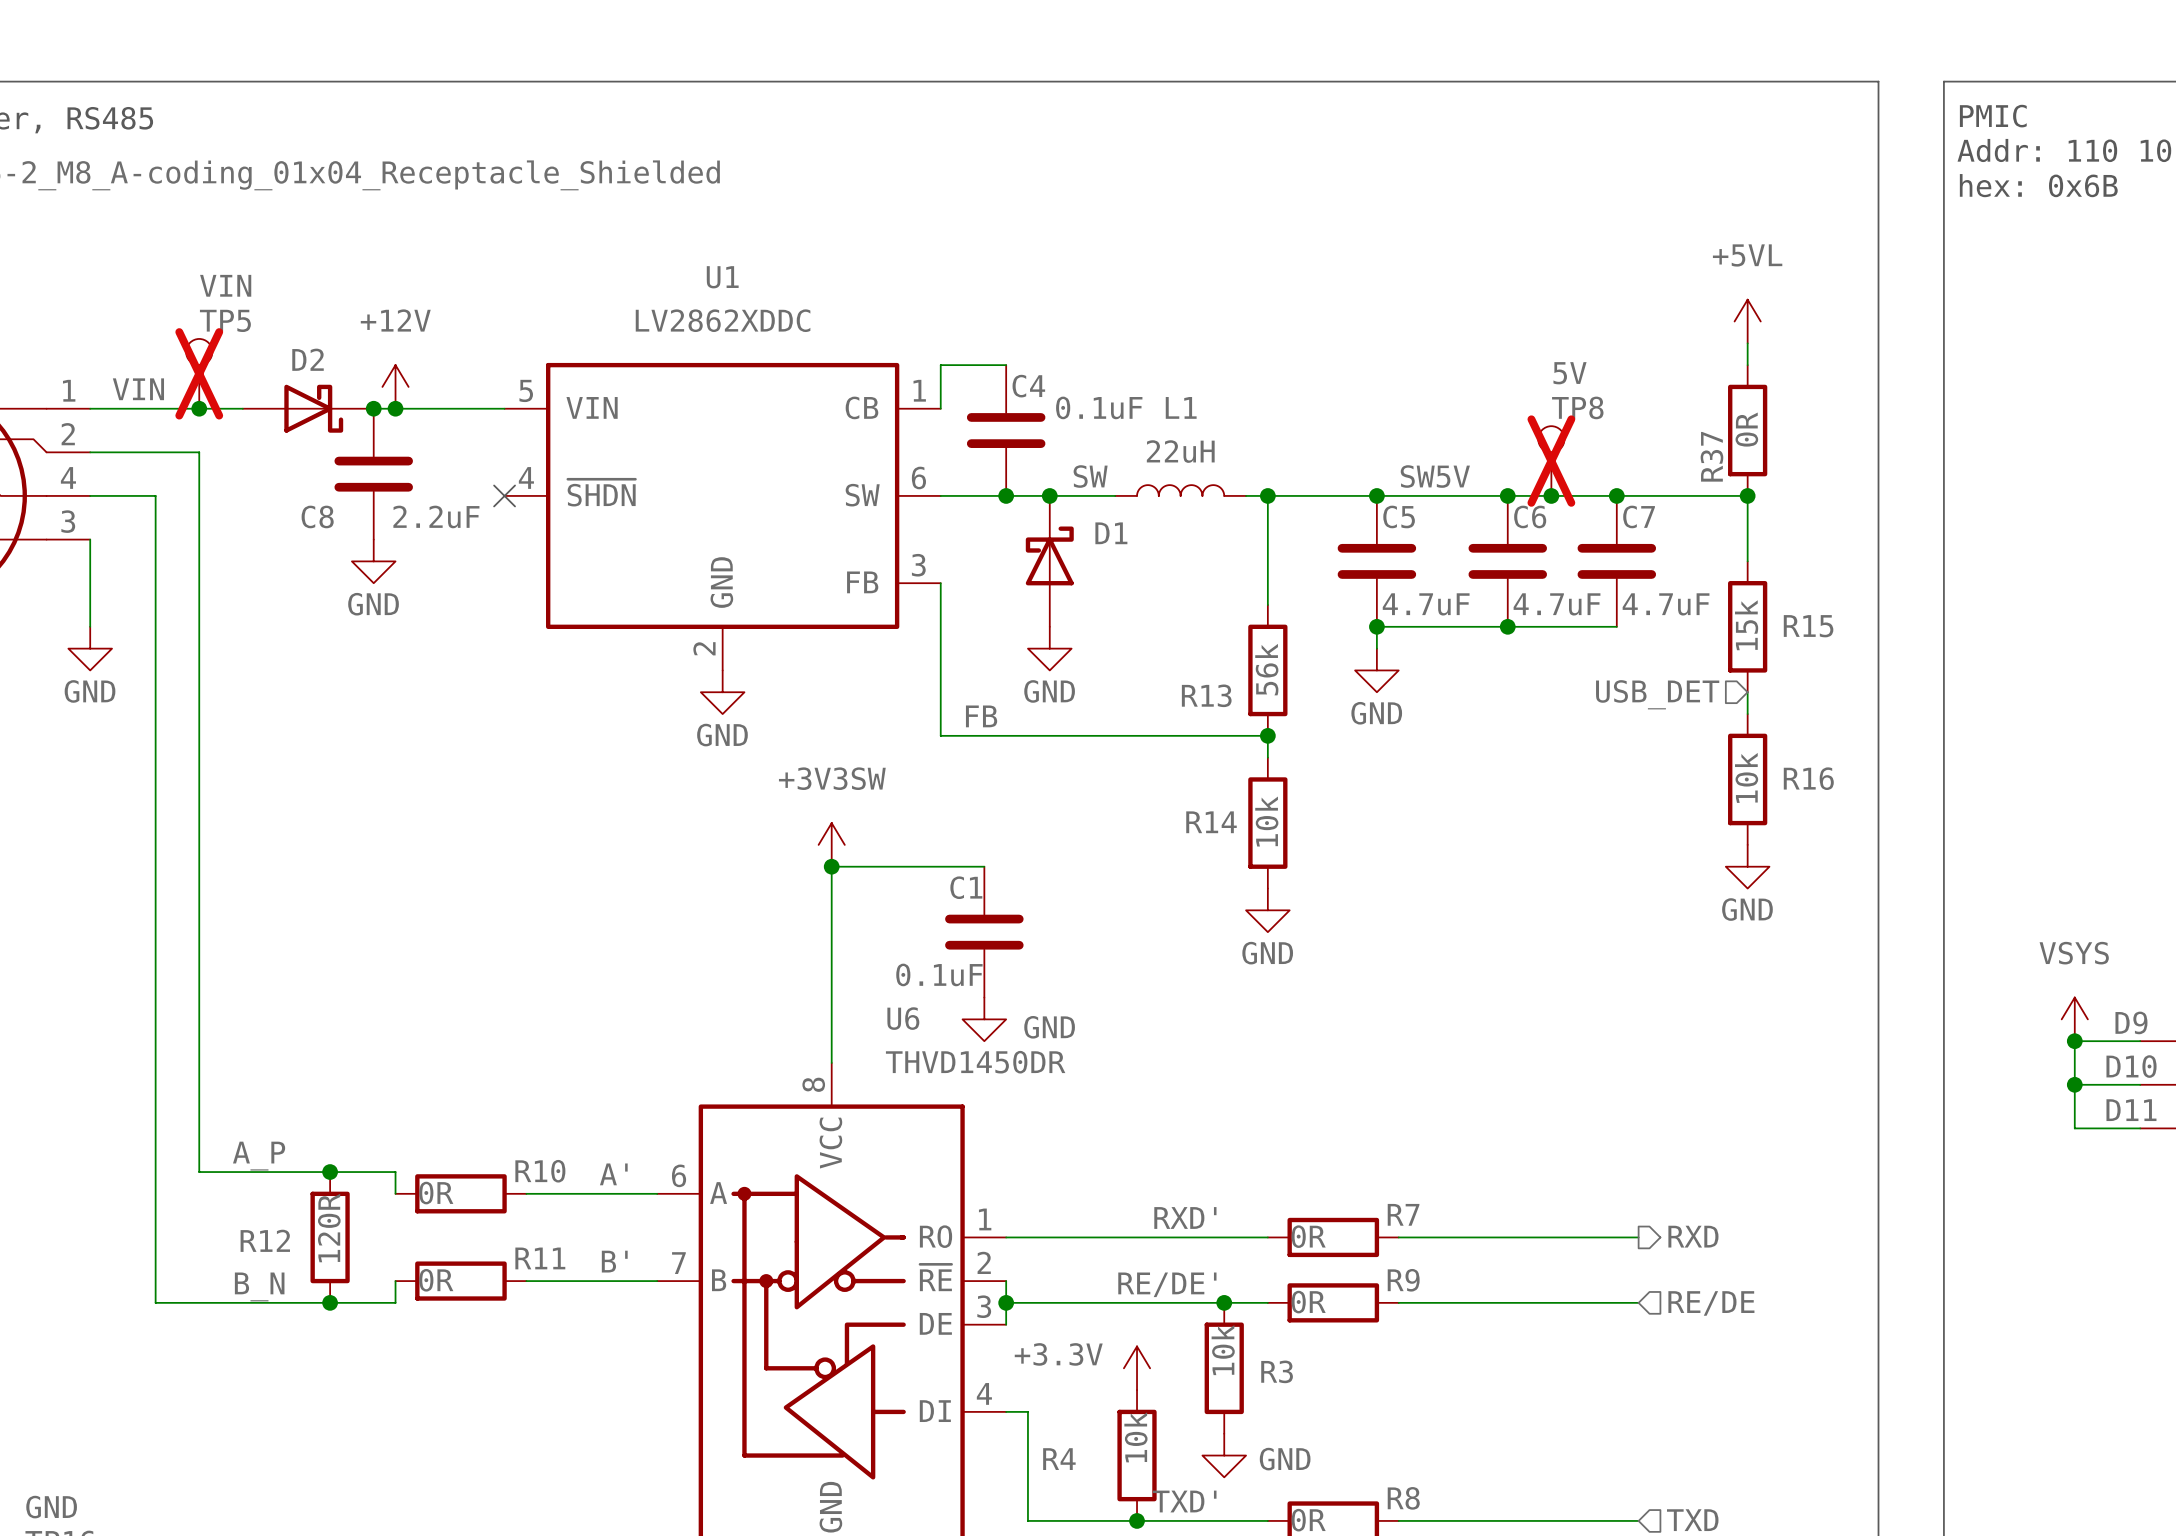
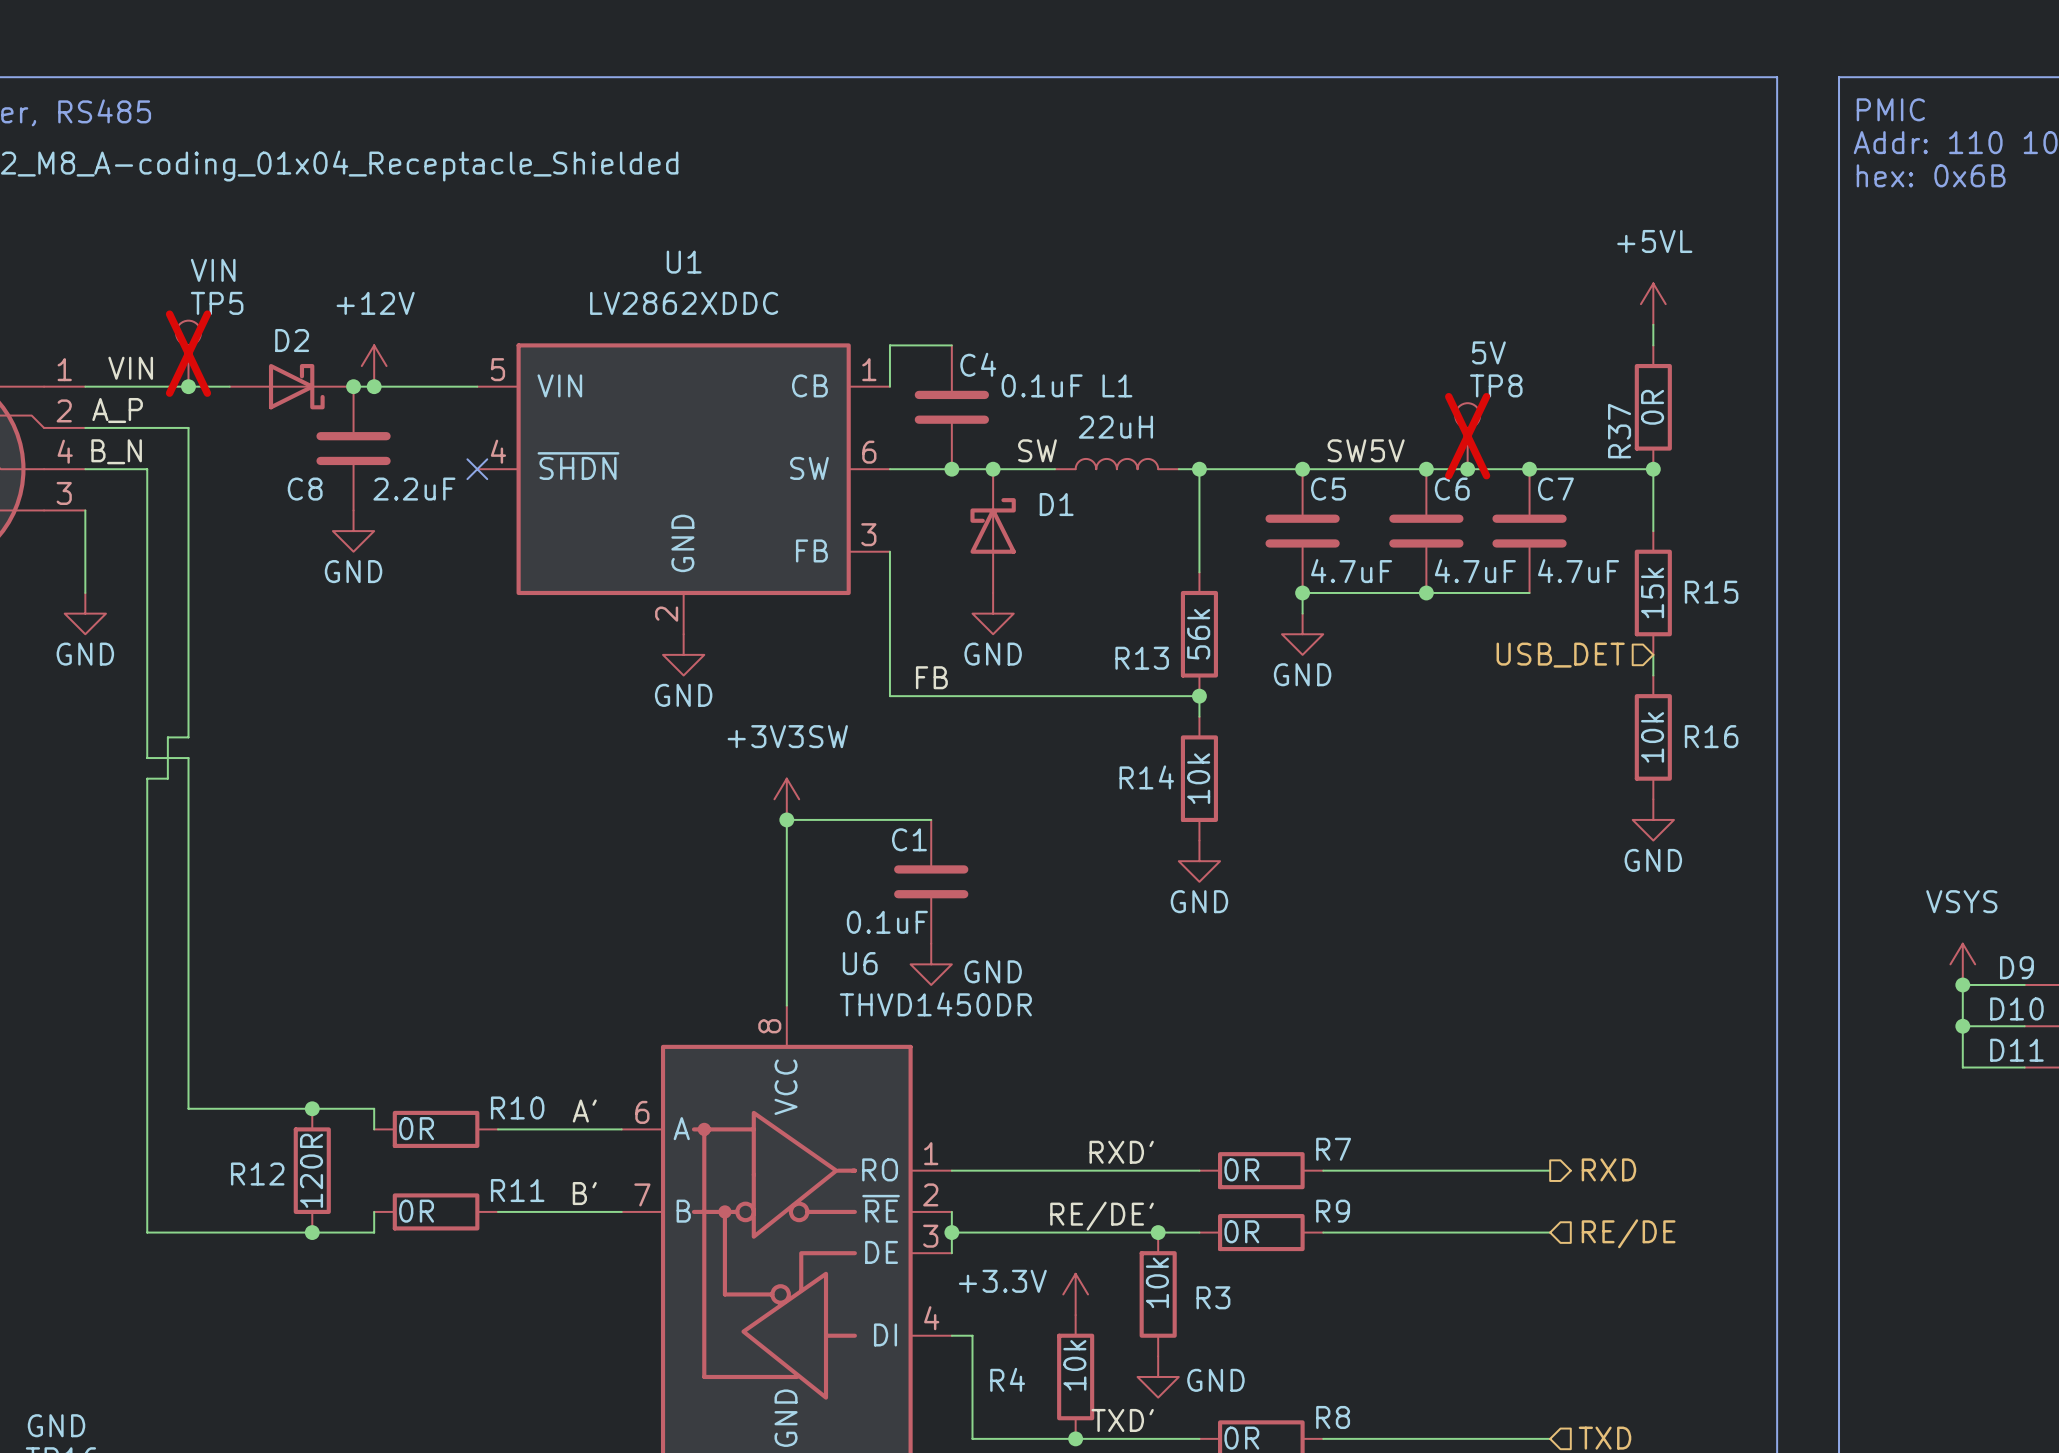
label: none -> A_P (117, 410)
label: none -> B_N (116, 451)
wire: (199, 779) (199, 801) -> (188, 737) (167, 737) (167, 778) (147, 778)
wire: (155, 801) (155, 823) -> (147, 758) (188, 758)
label: A_P (259, 1156) -> none
label: B_N (259, 1286) -> none

